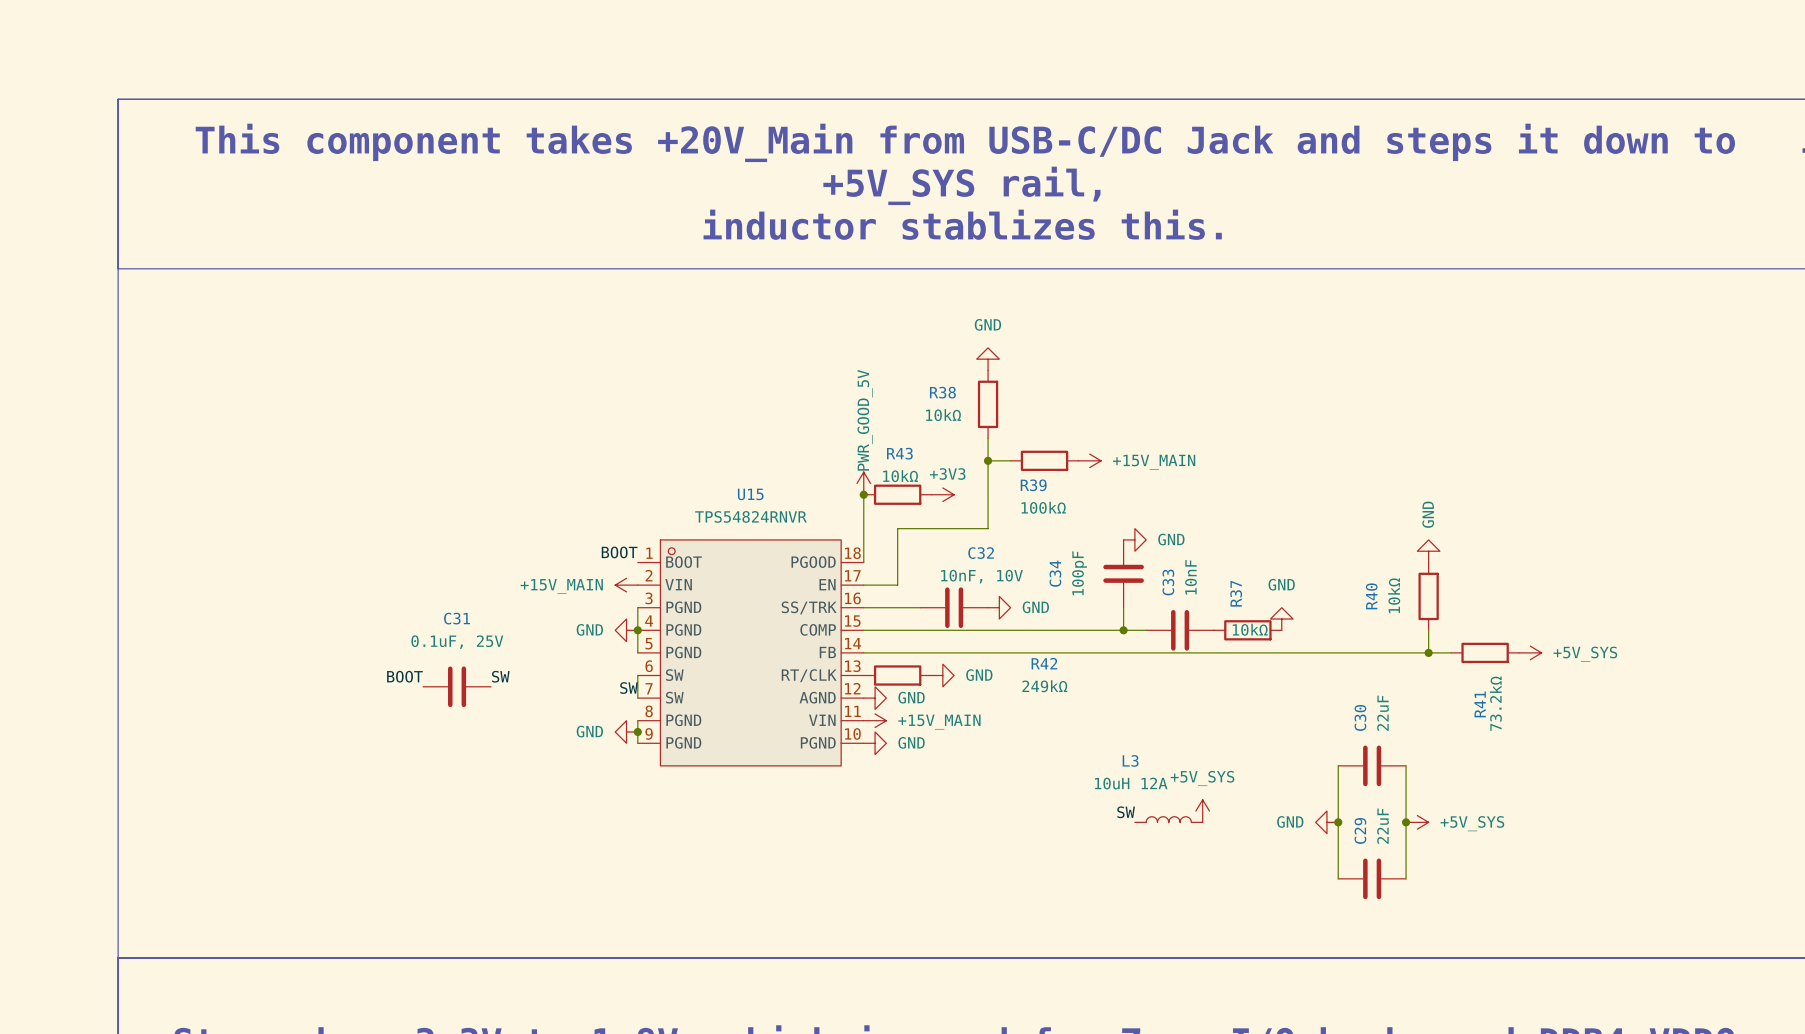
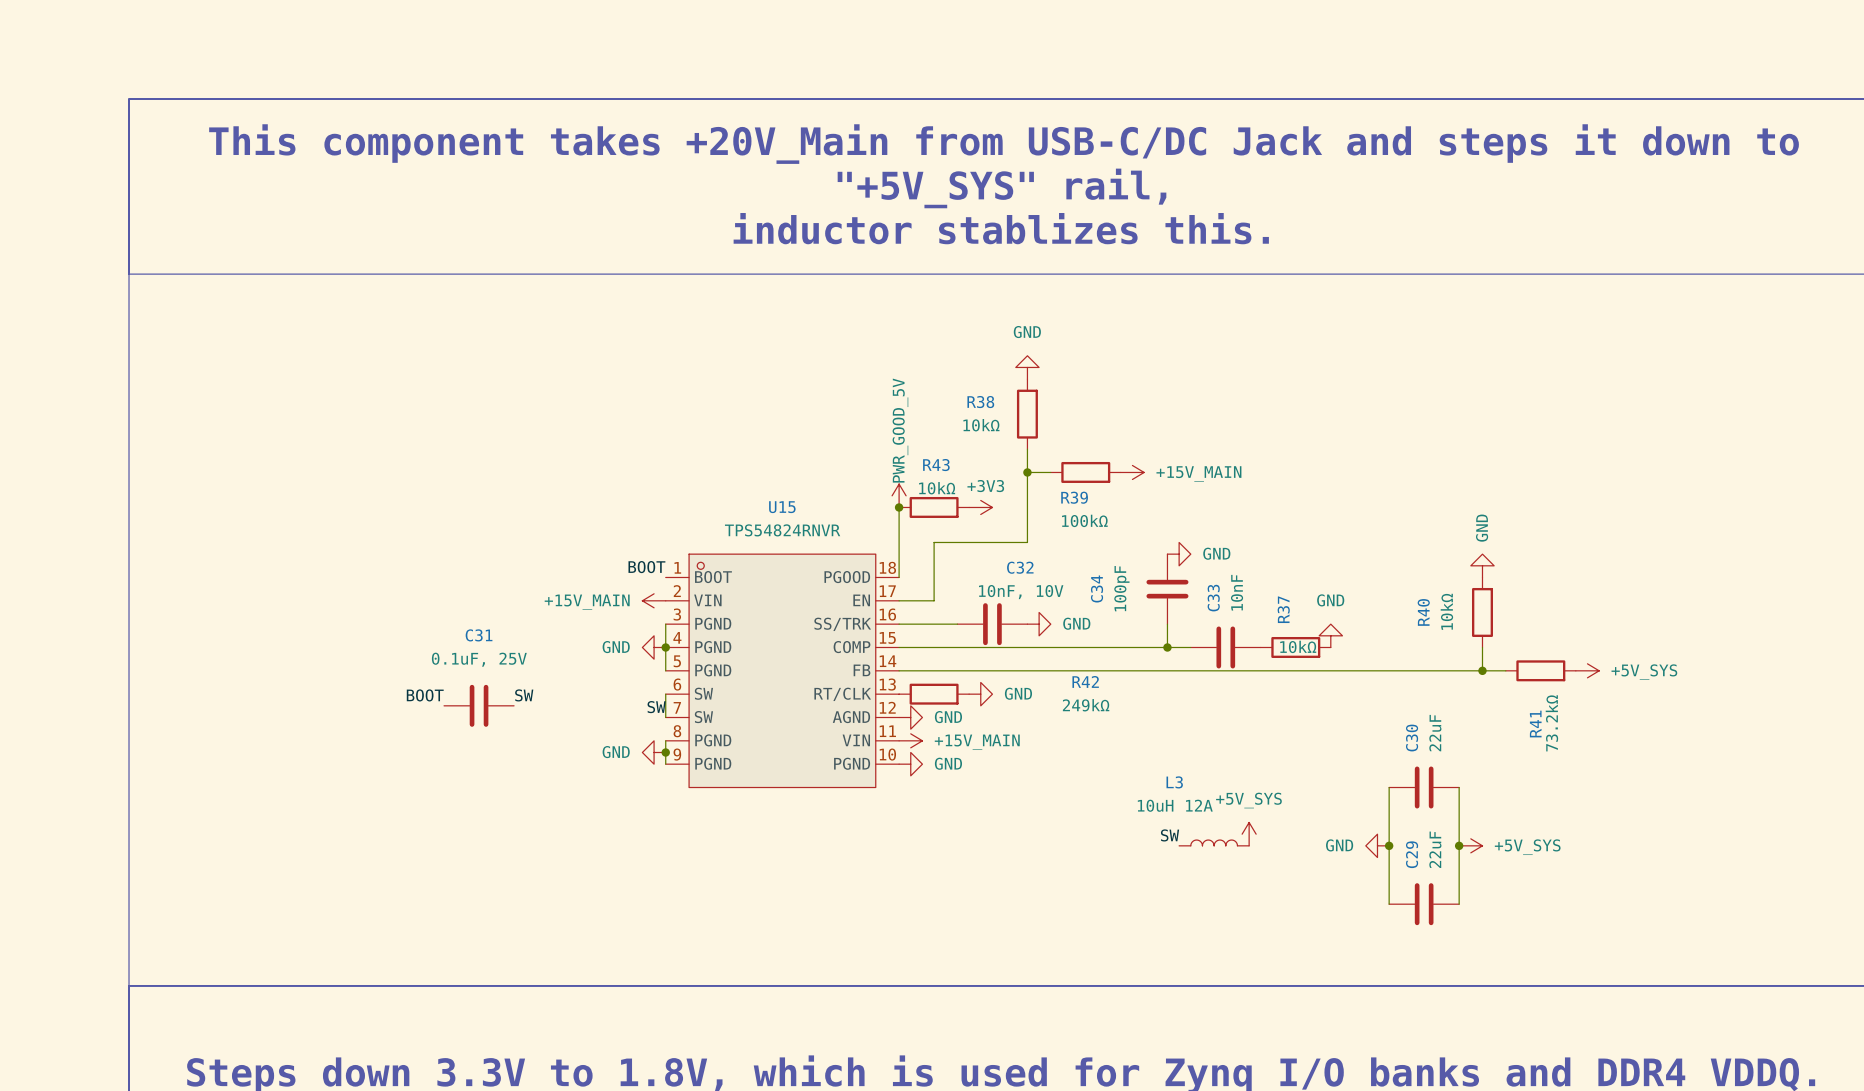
text: +5V_SYS rail, (961, 185) -> "+5V_SYS" rail, (1002, 188)

